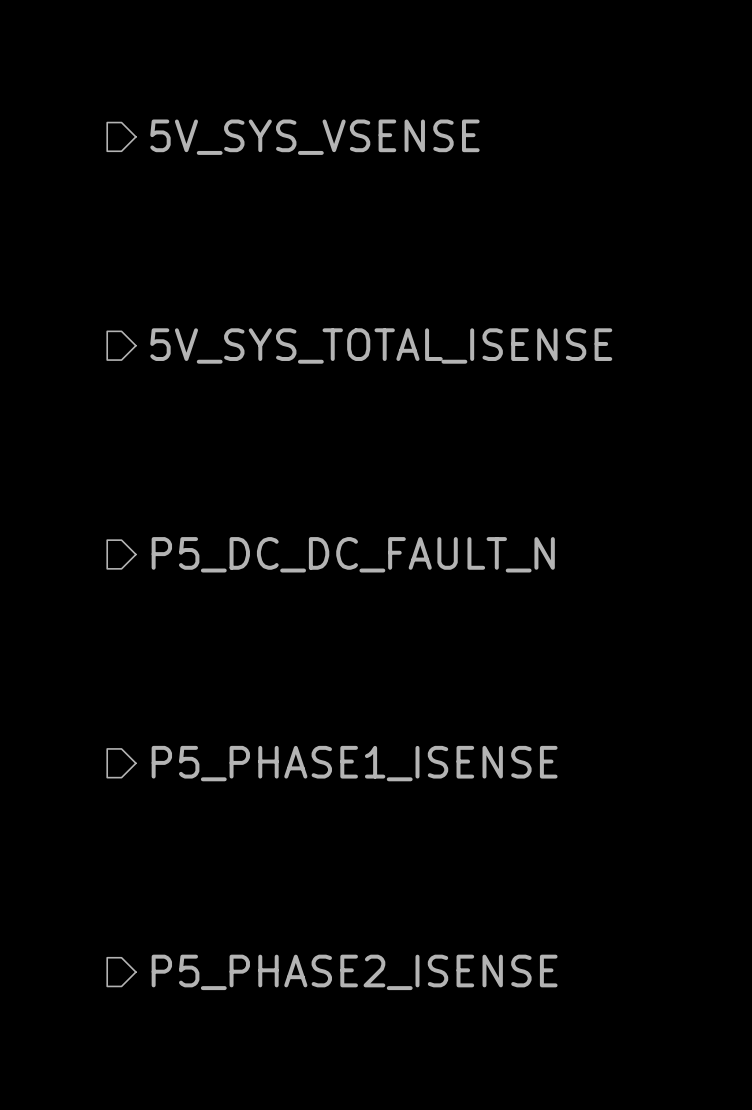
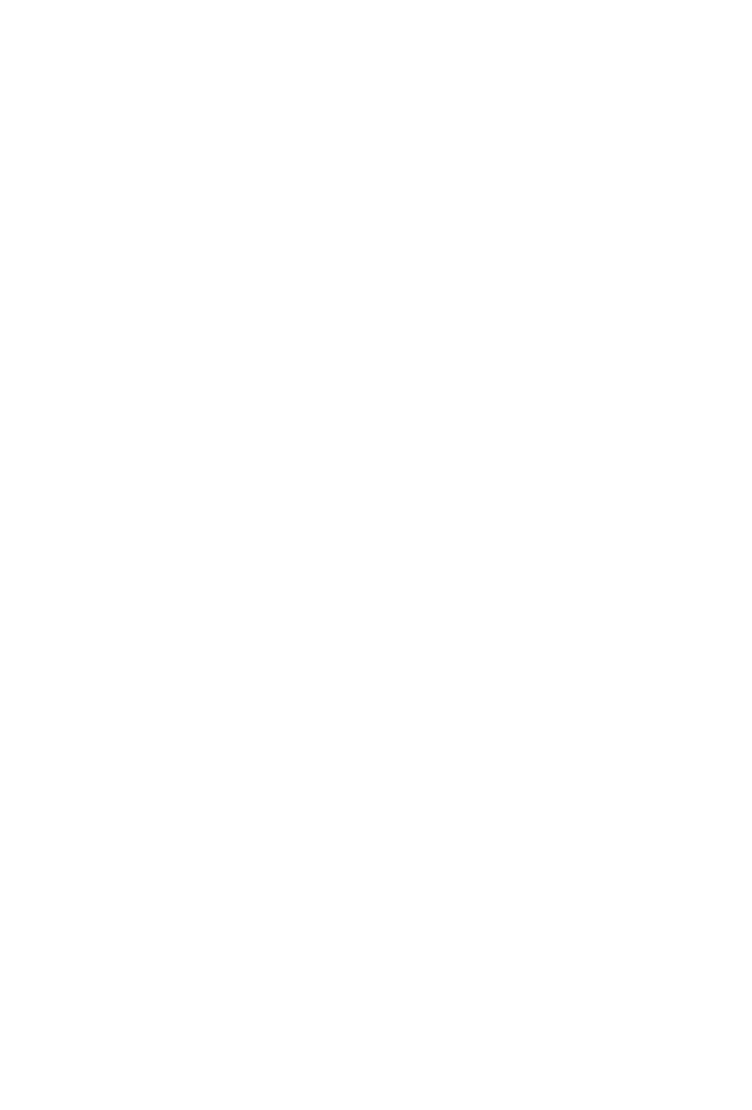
hierarchical label: 5V_SYS_VSENSE (314, 137) -> none
hierarchical label: 5V_SYS_TOTAL_ISENSE (381, 346) -> none
hierarchical label: P5_DC_DC_FAULT_N (353, 554) -> none
hierarchical label: P5_PHASE1_ISENSE (354, 763) -> none
hierarchical label: P5_PHASE2_ISENSE (354, 972) -> none

